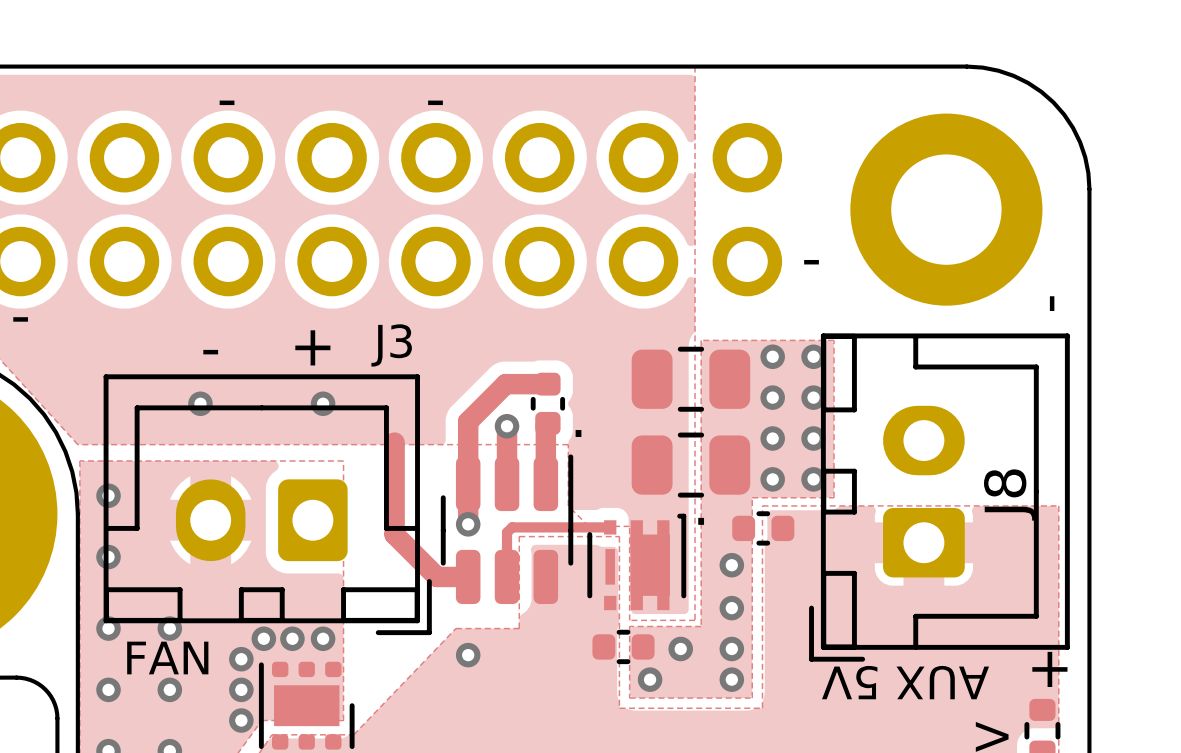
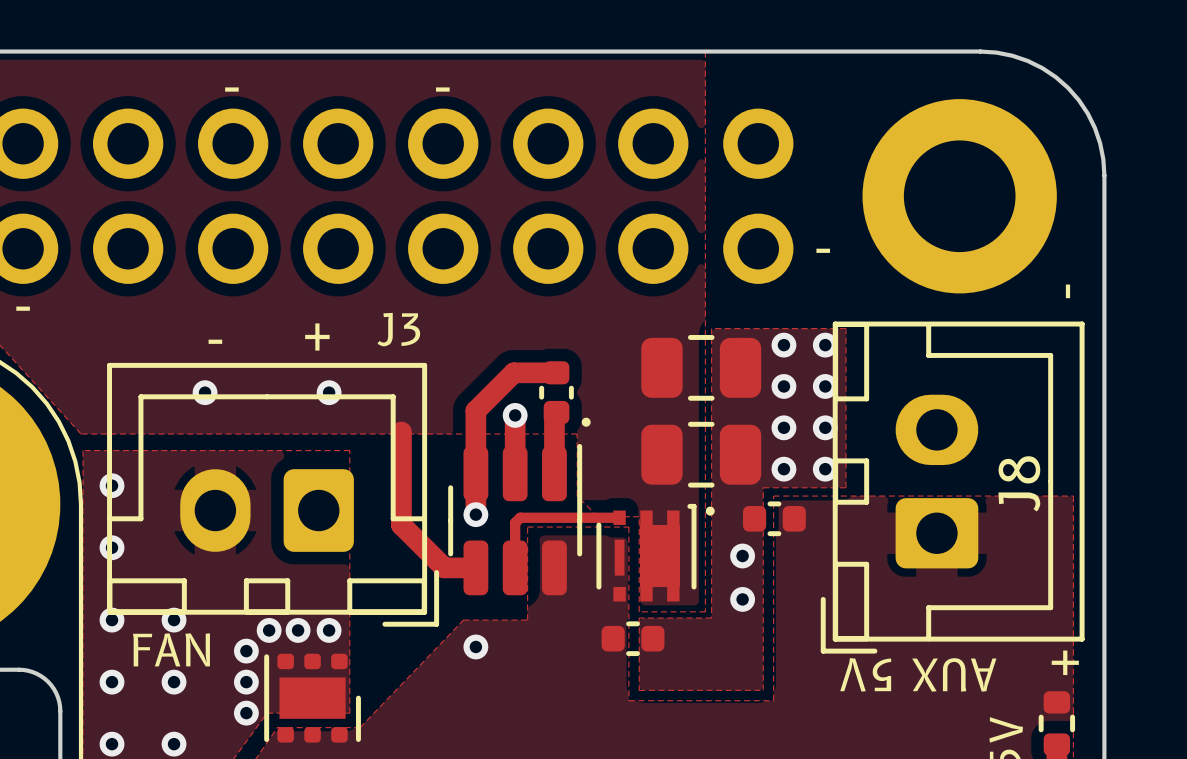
via: (680, 648) -> none
via: (731, 648) -> none
via: (650, 679) -> none
via: (731, 679) -> none

